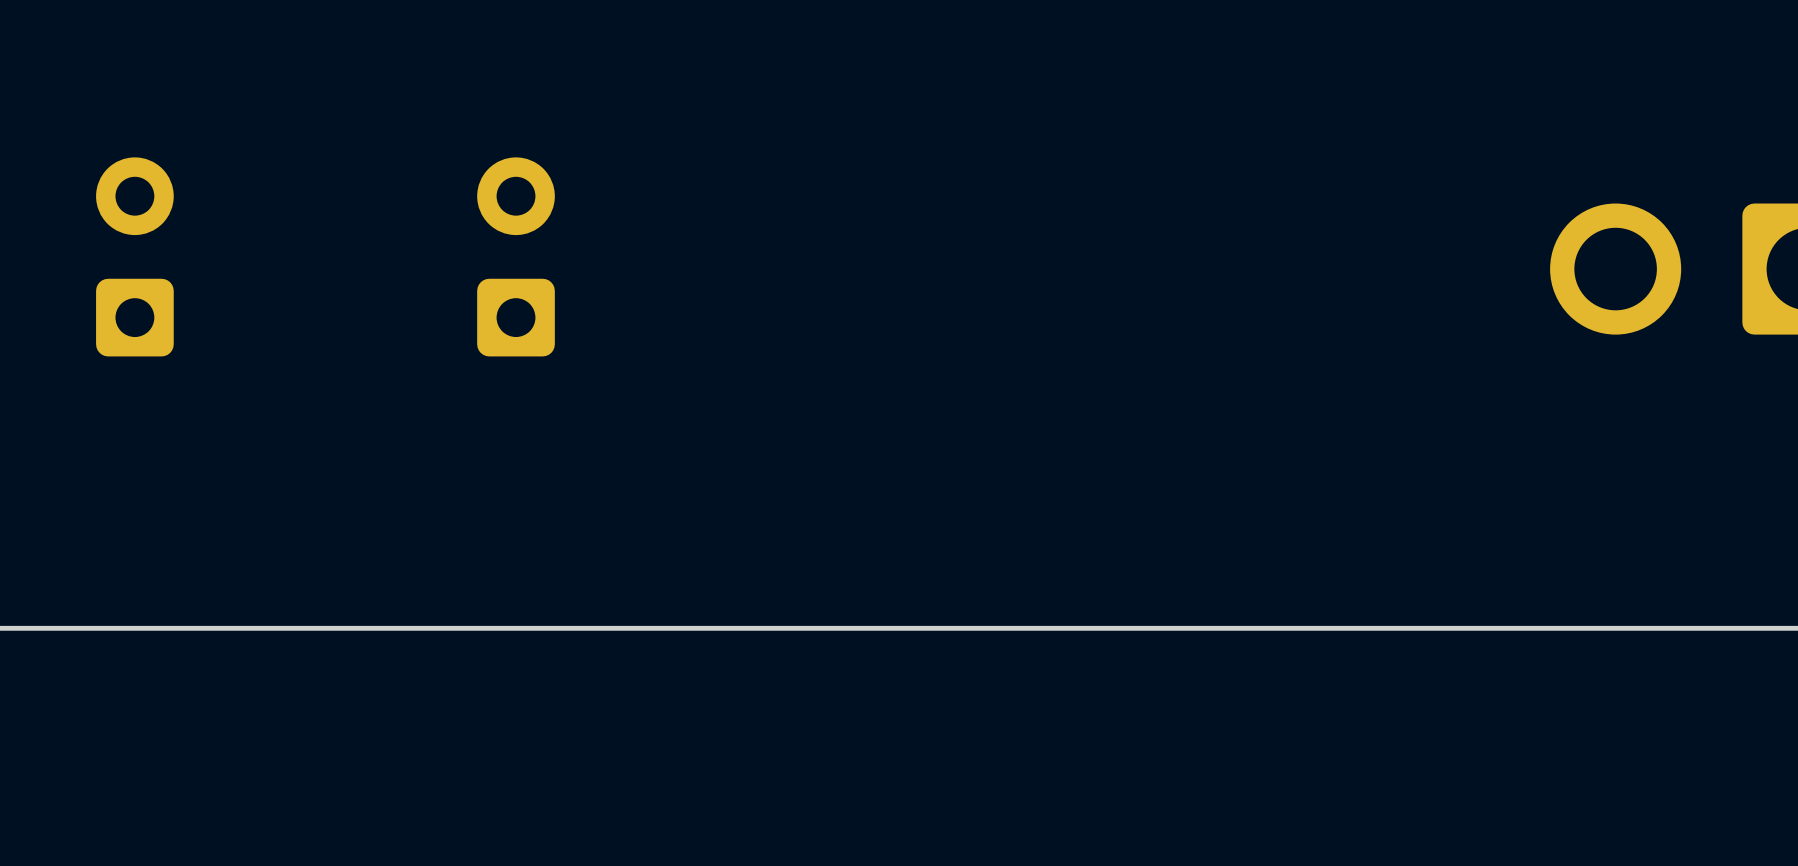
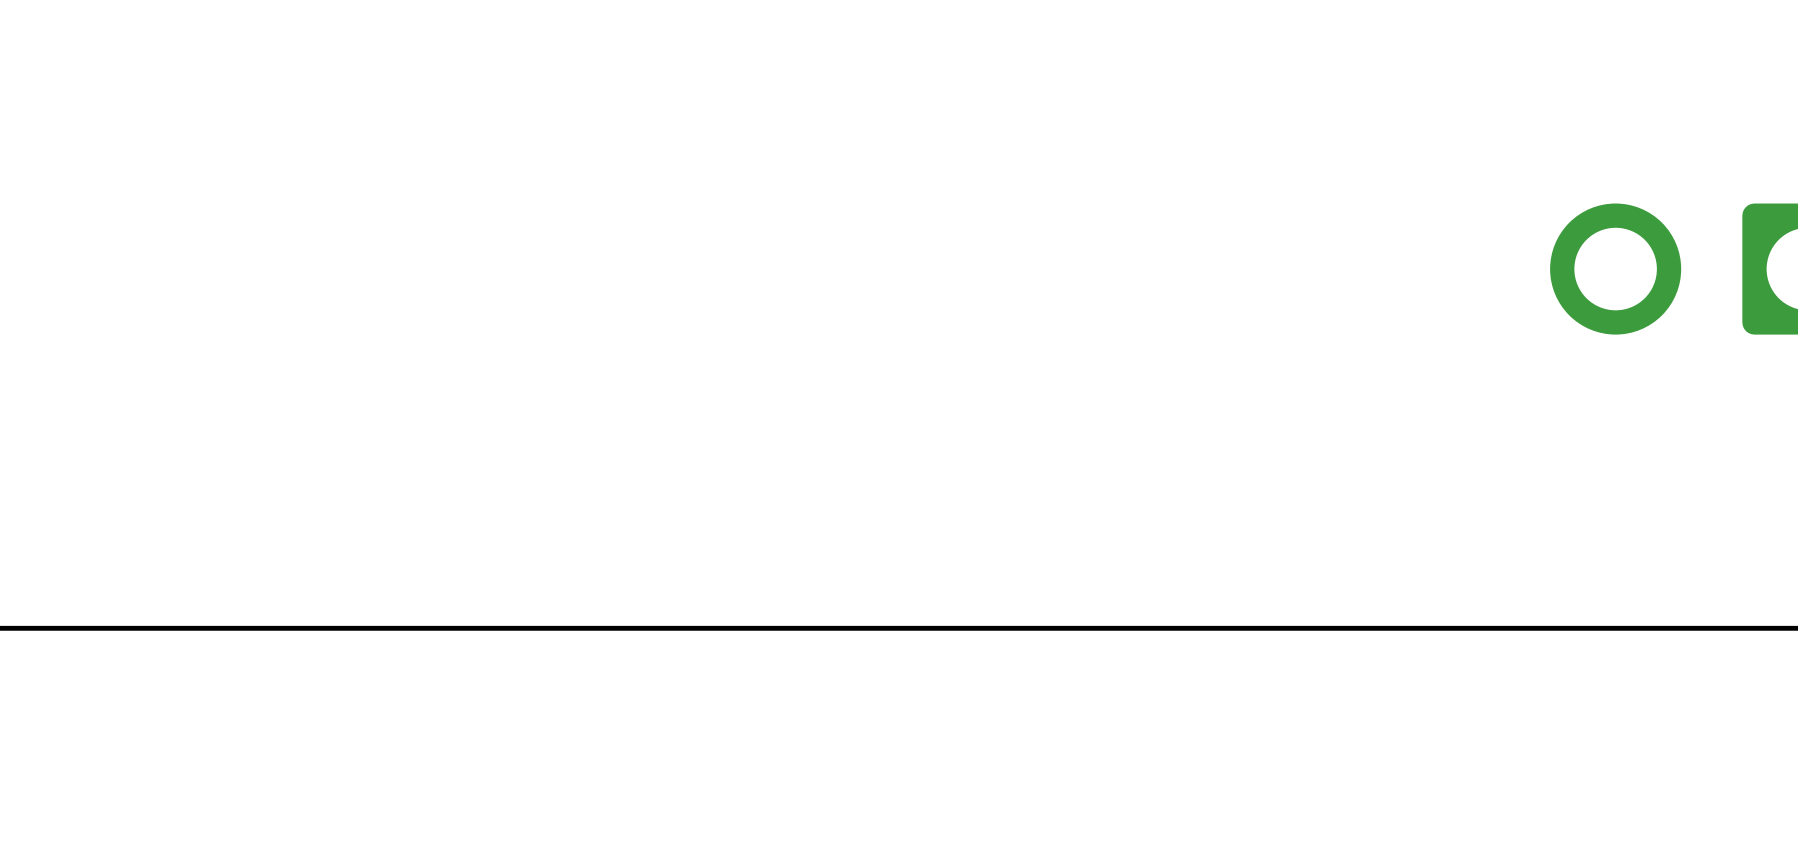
part: (134, 256) -> none
part: (516, 256) -> none

